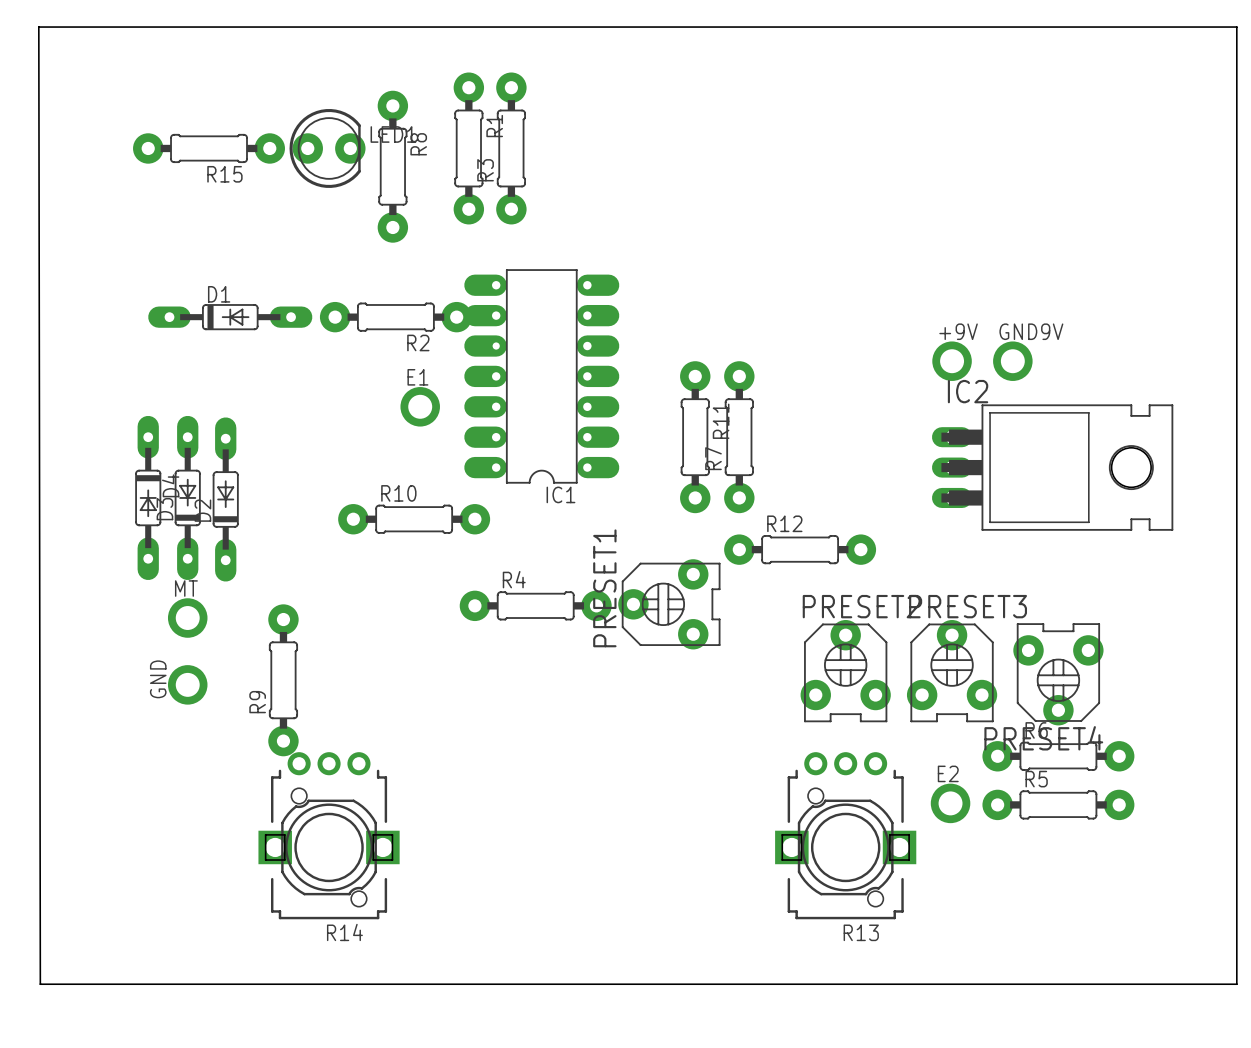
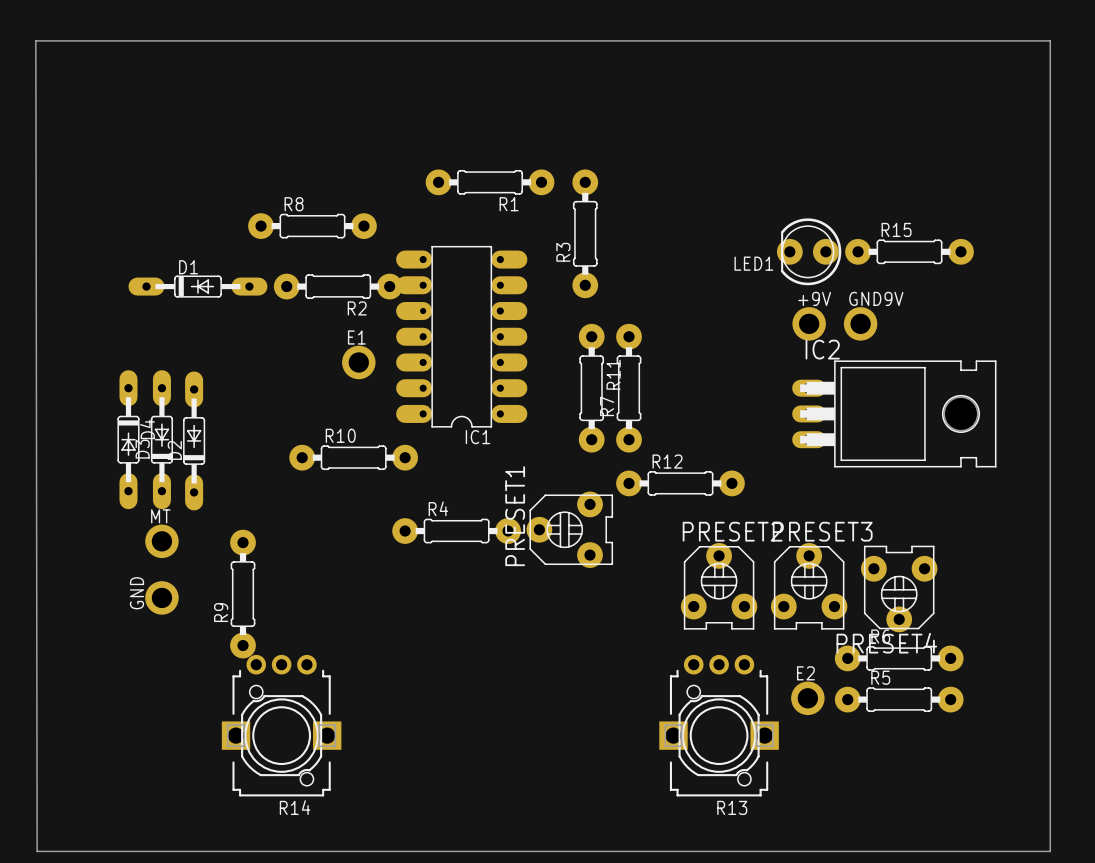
R8 name position: R8 (418, 144) -> R8 (294, 204)
R15 position: (209, 148) -> (909, 251)
LED1 rotation: 0° (327, 148) -> 180° (809, 251)
LED1 position: (327, 148) -> (809, 251)
R1 rotation: 0° (468, 148) -> 90° clockwise (490, 182)
R1 position: (468, 148) -> (490, 182)
R3 position: (511, 148) -> (585, 233)
R8 rotation: 0° (392, 166) -> 90° clockwise (312, 226)
R15 name position: R15 (224, 174) -> R15 (896, 229)

